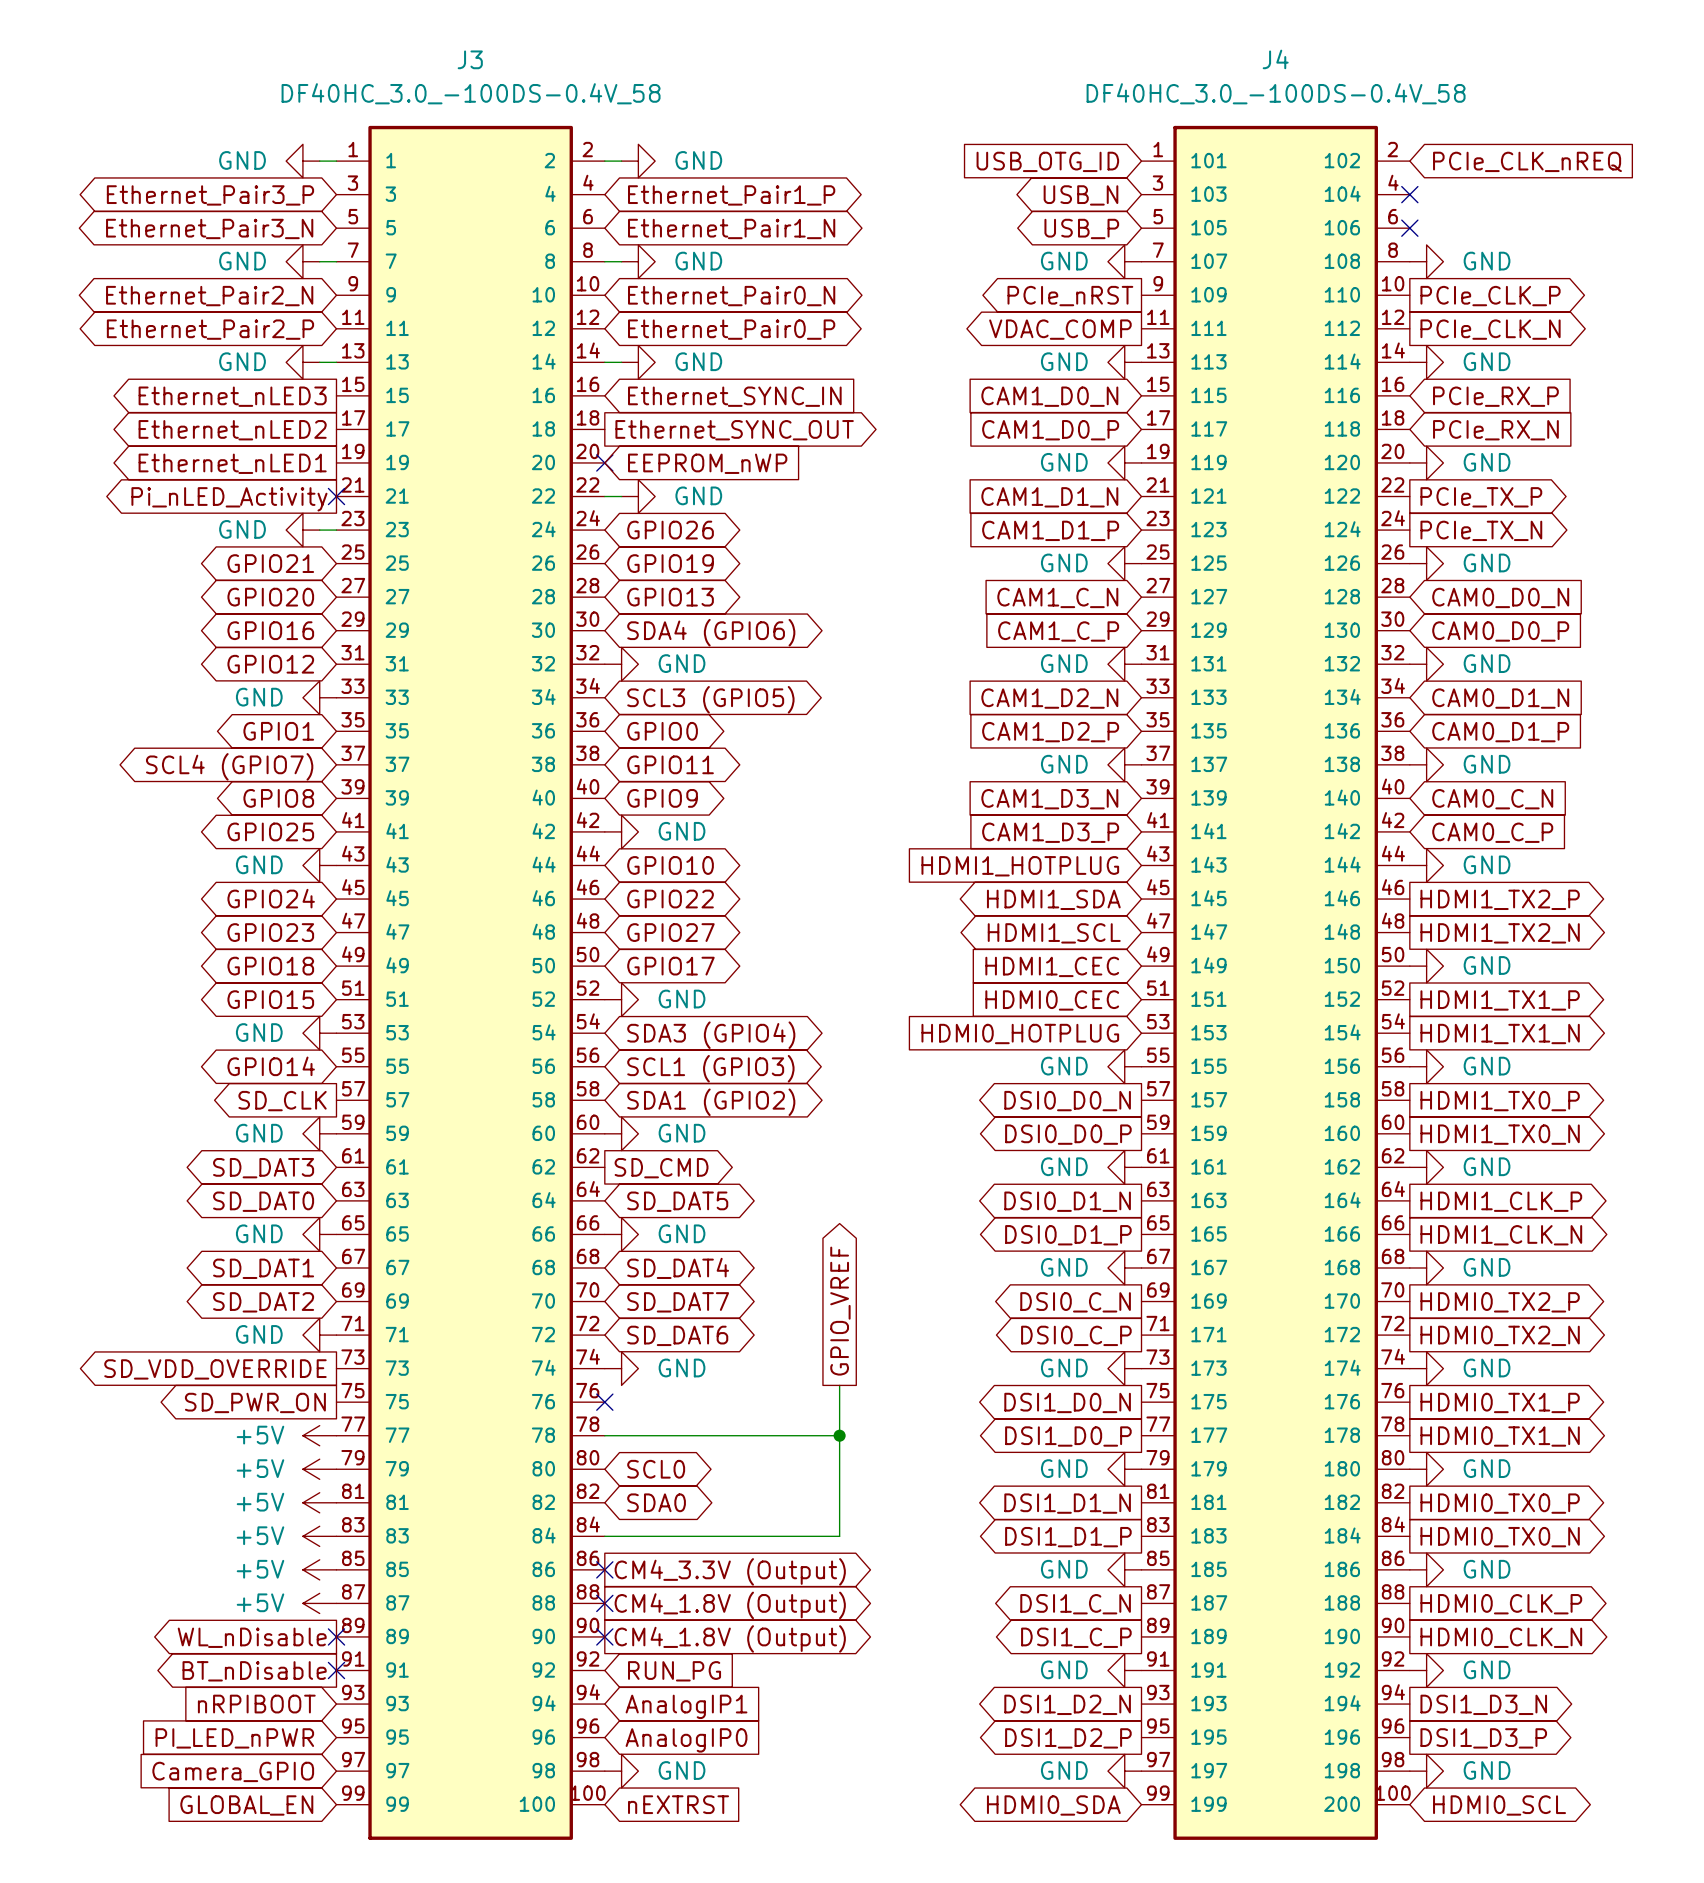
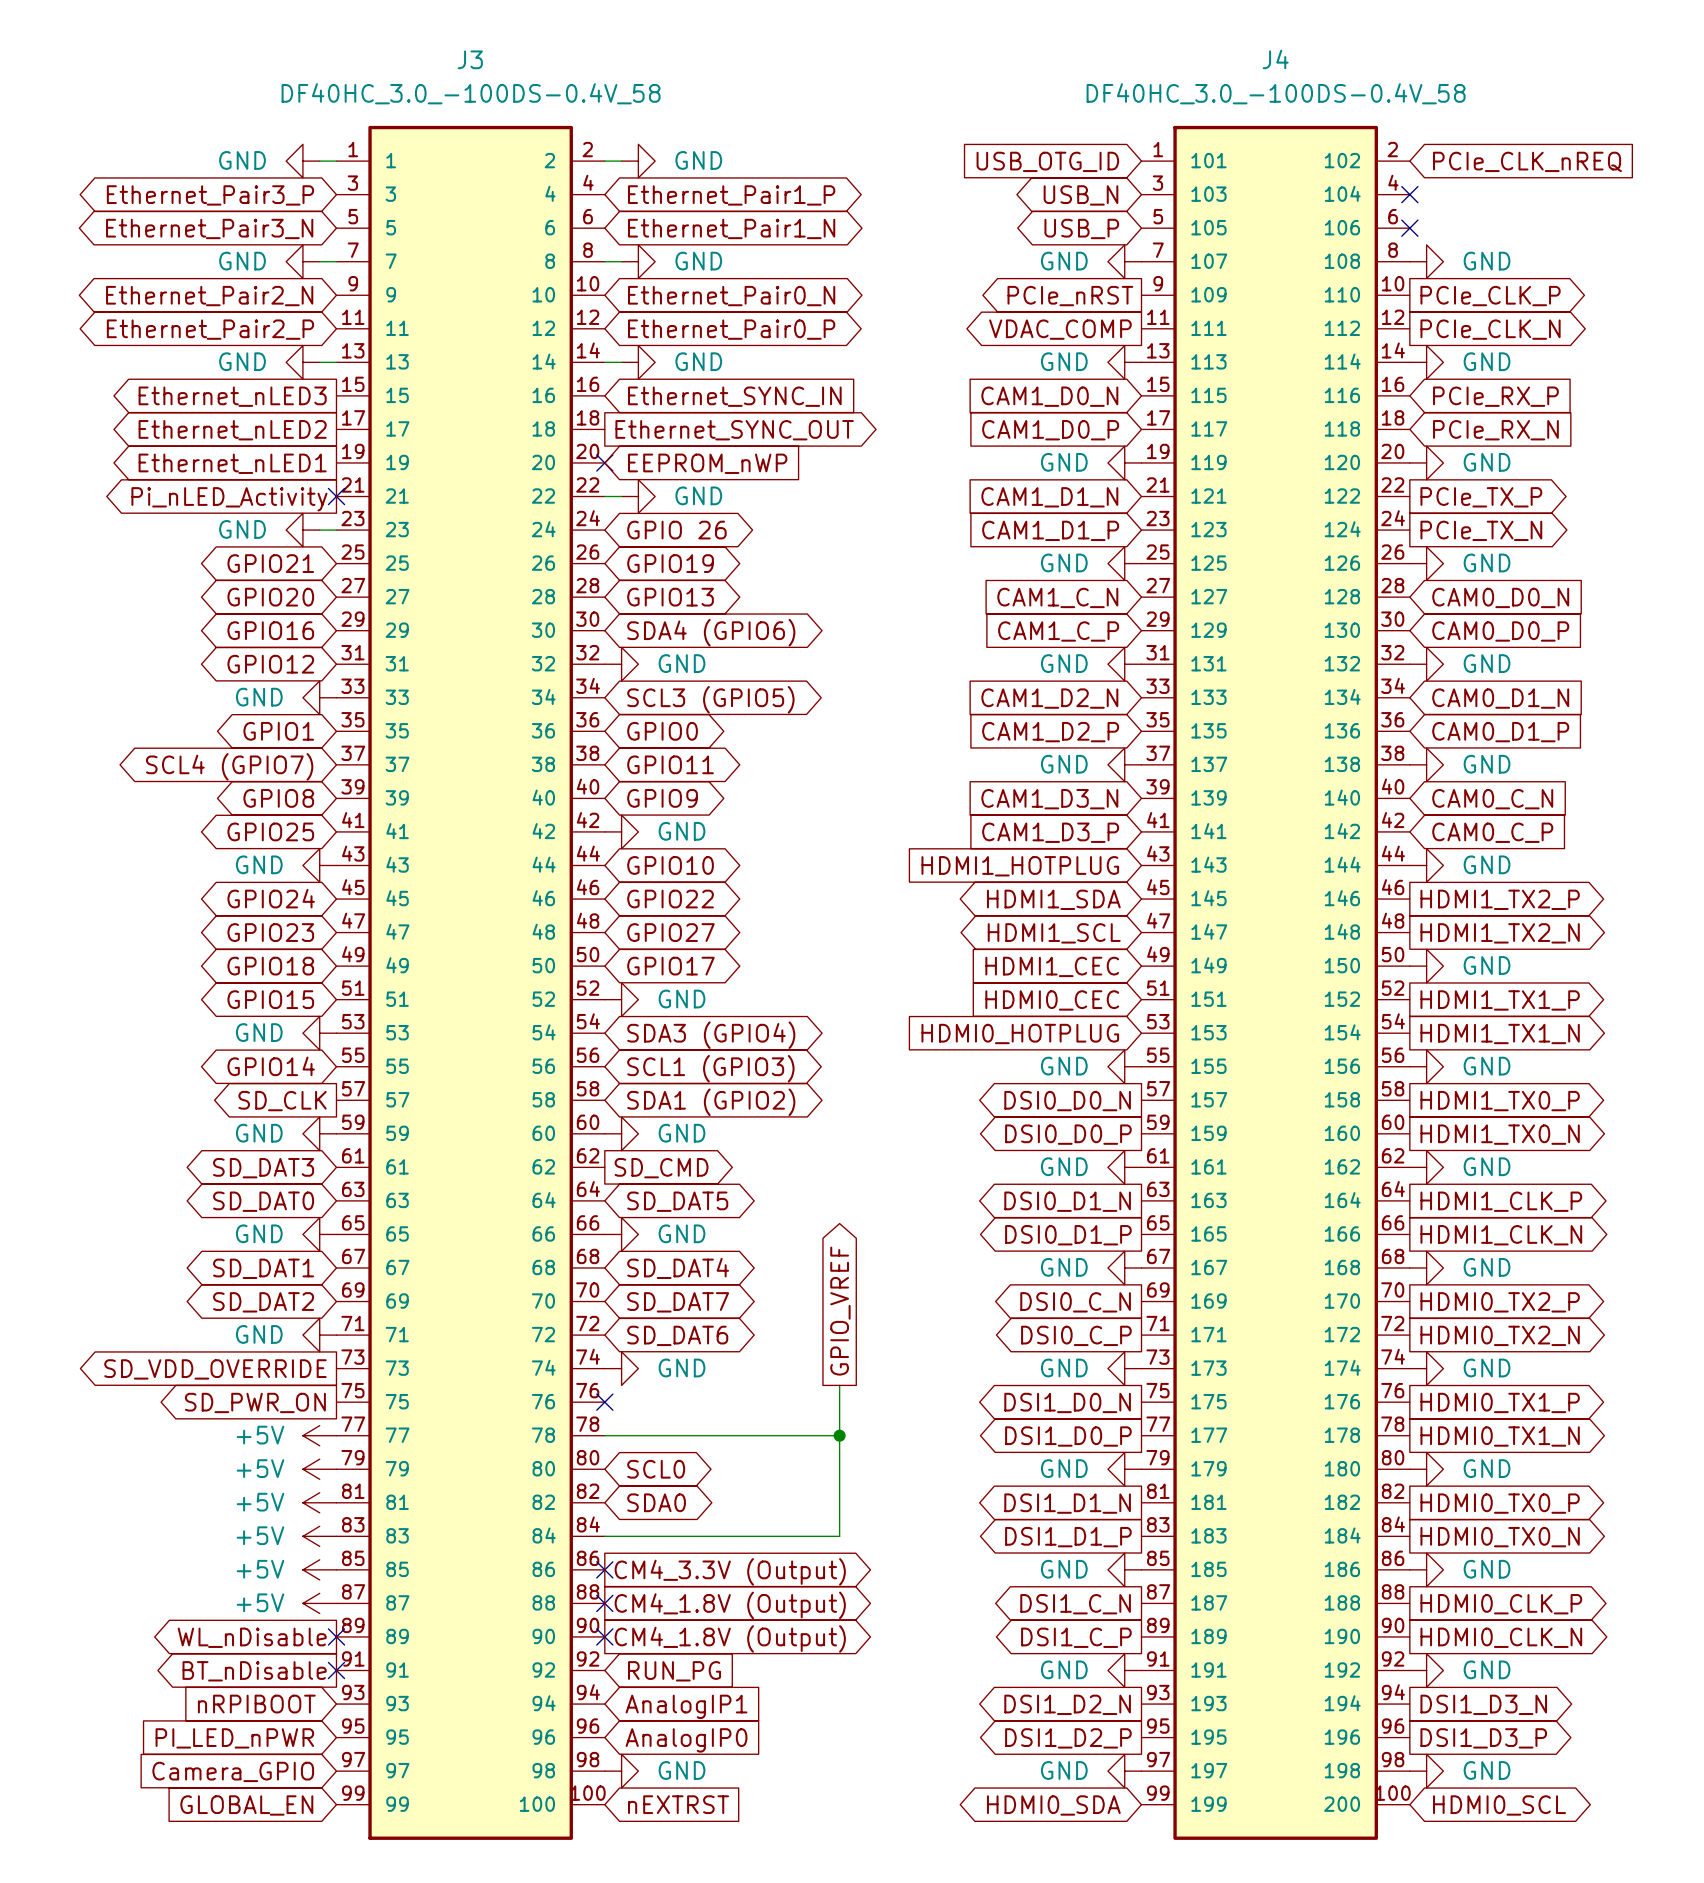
global label: GPIO26 (670, 530) -> GPIO 26 (676, 530)

